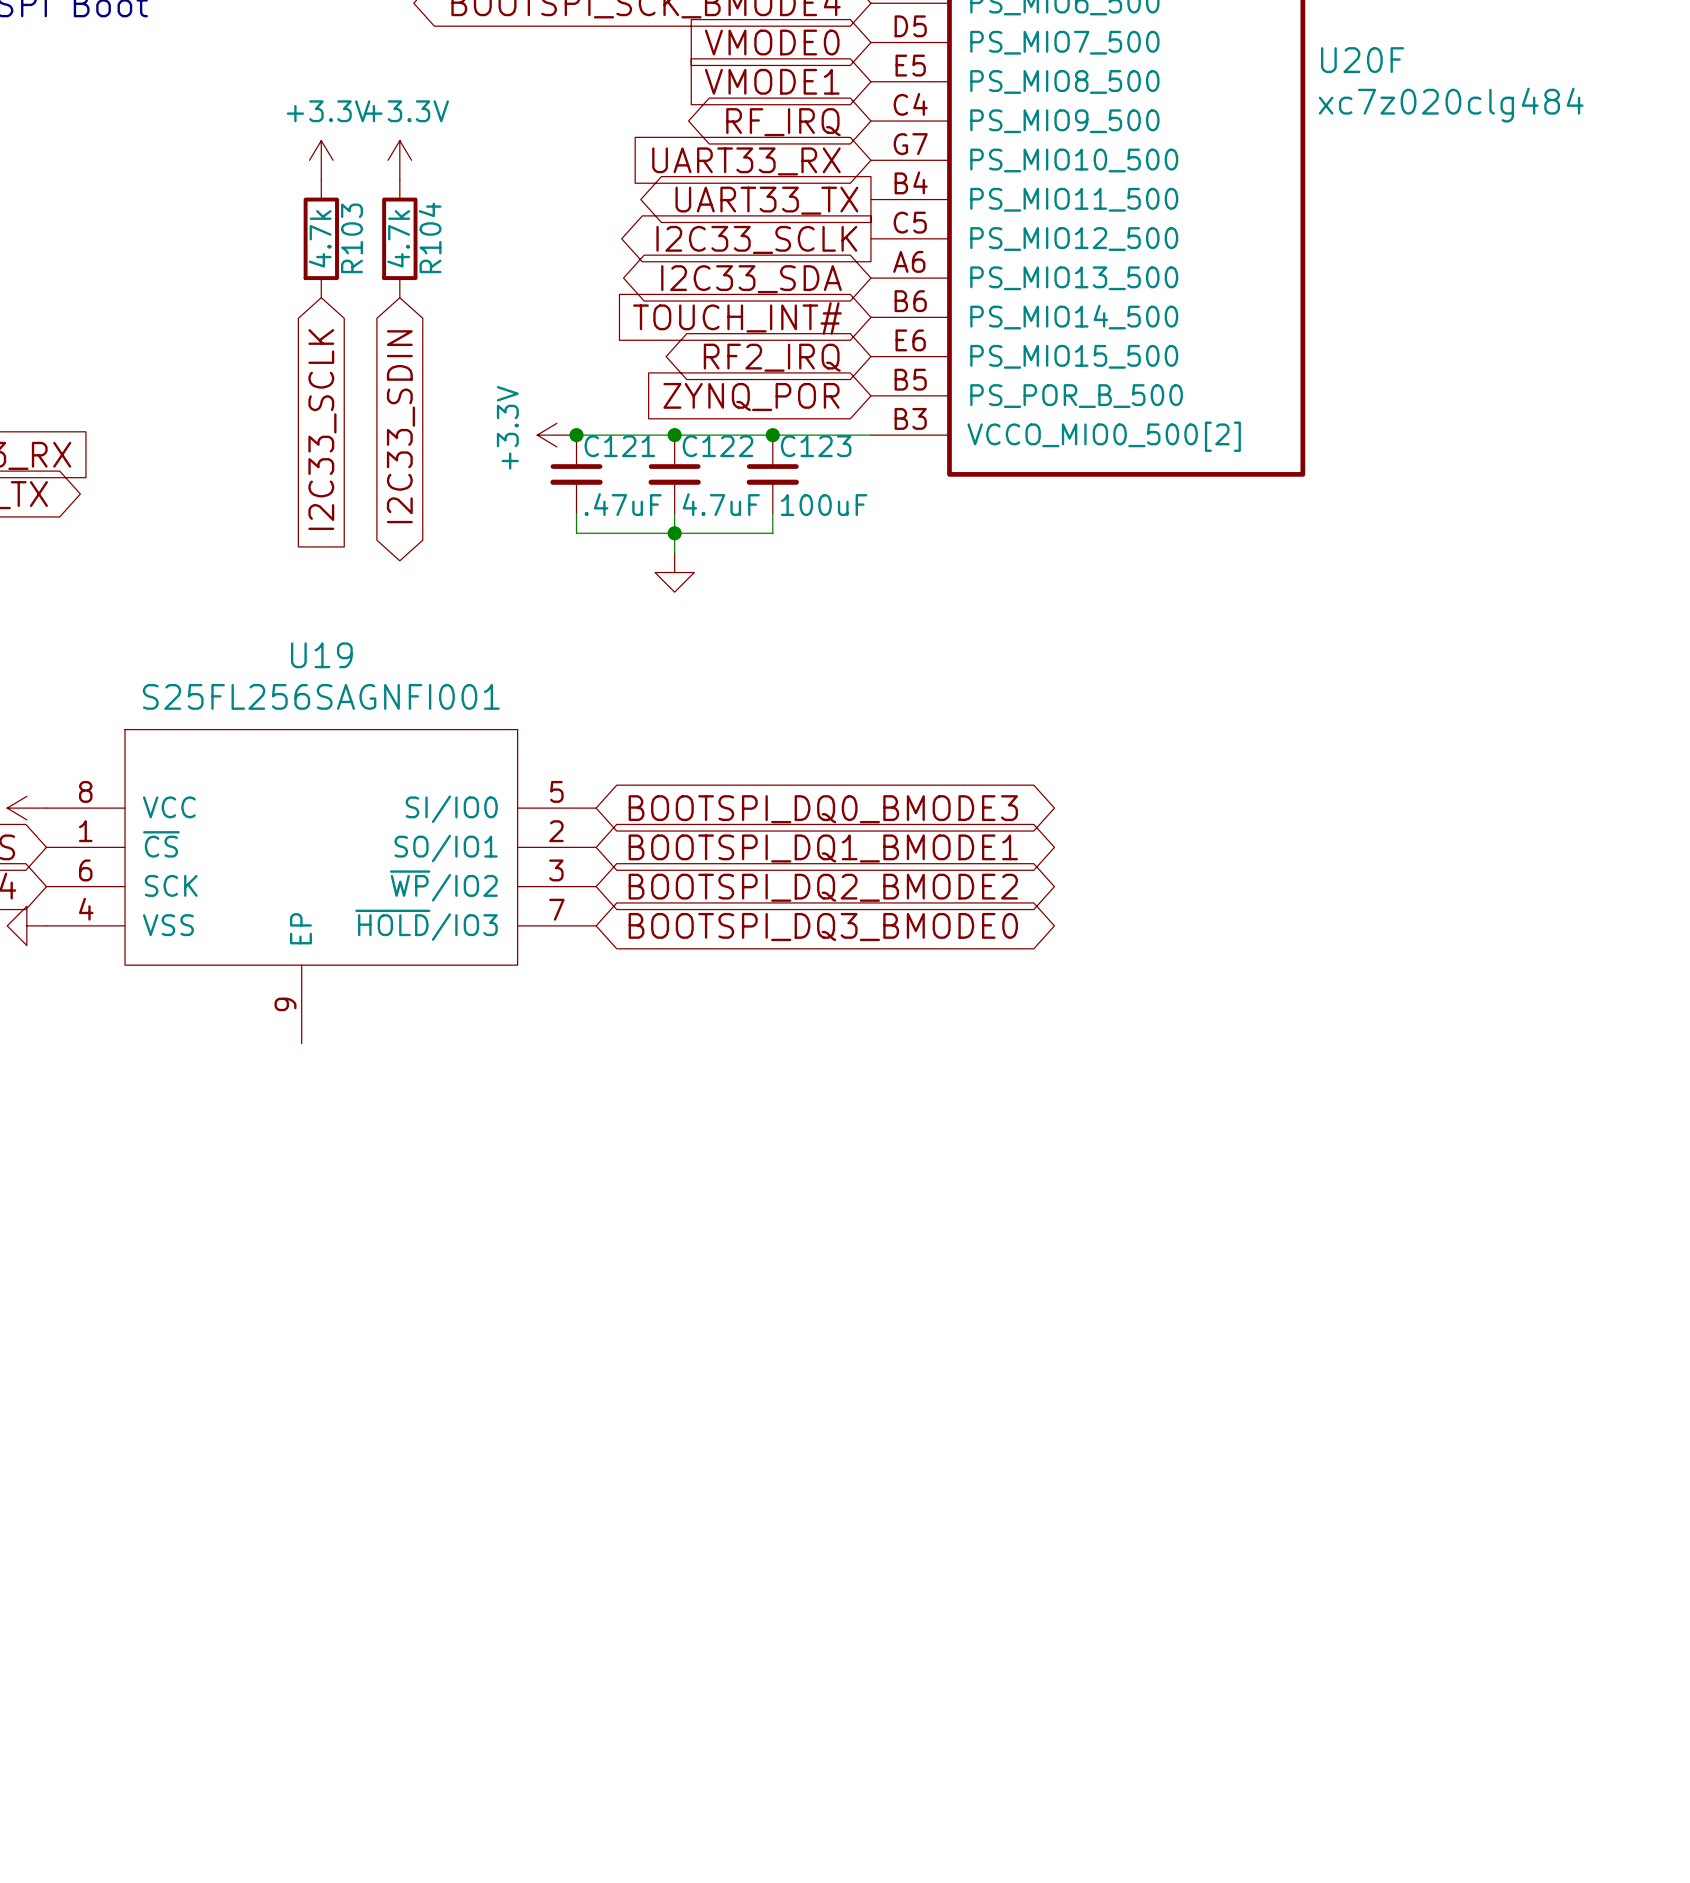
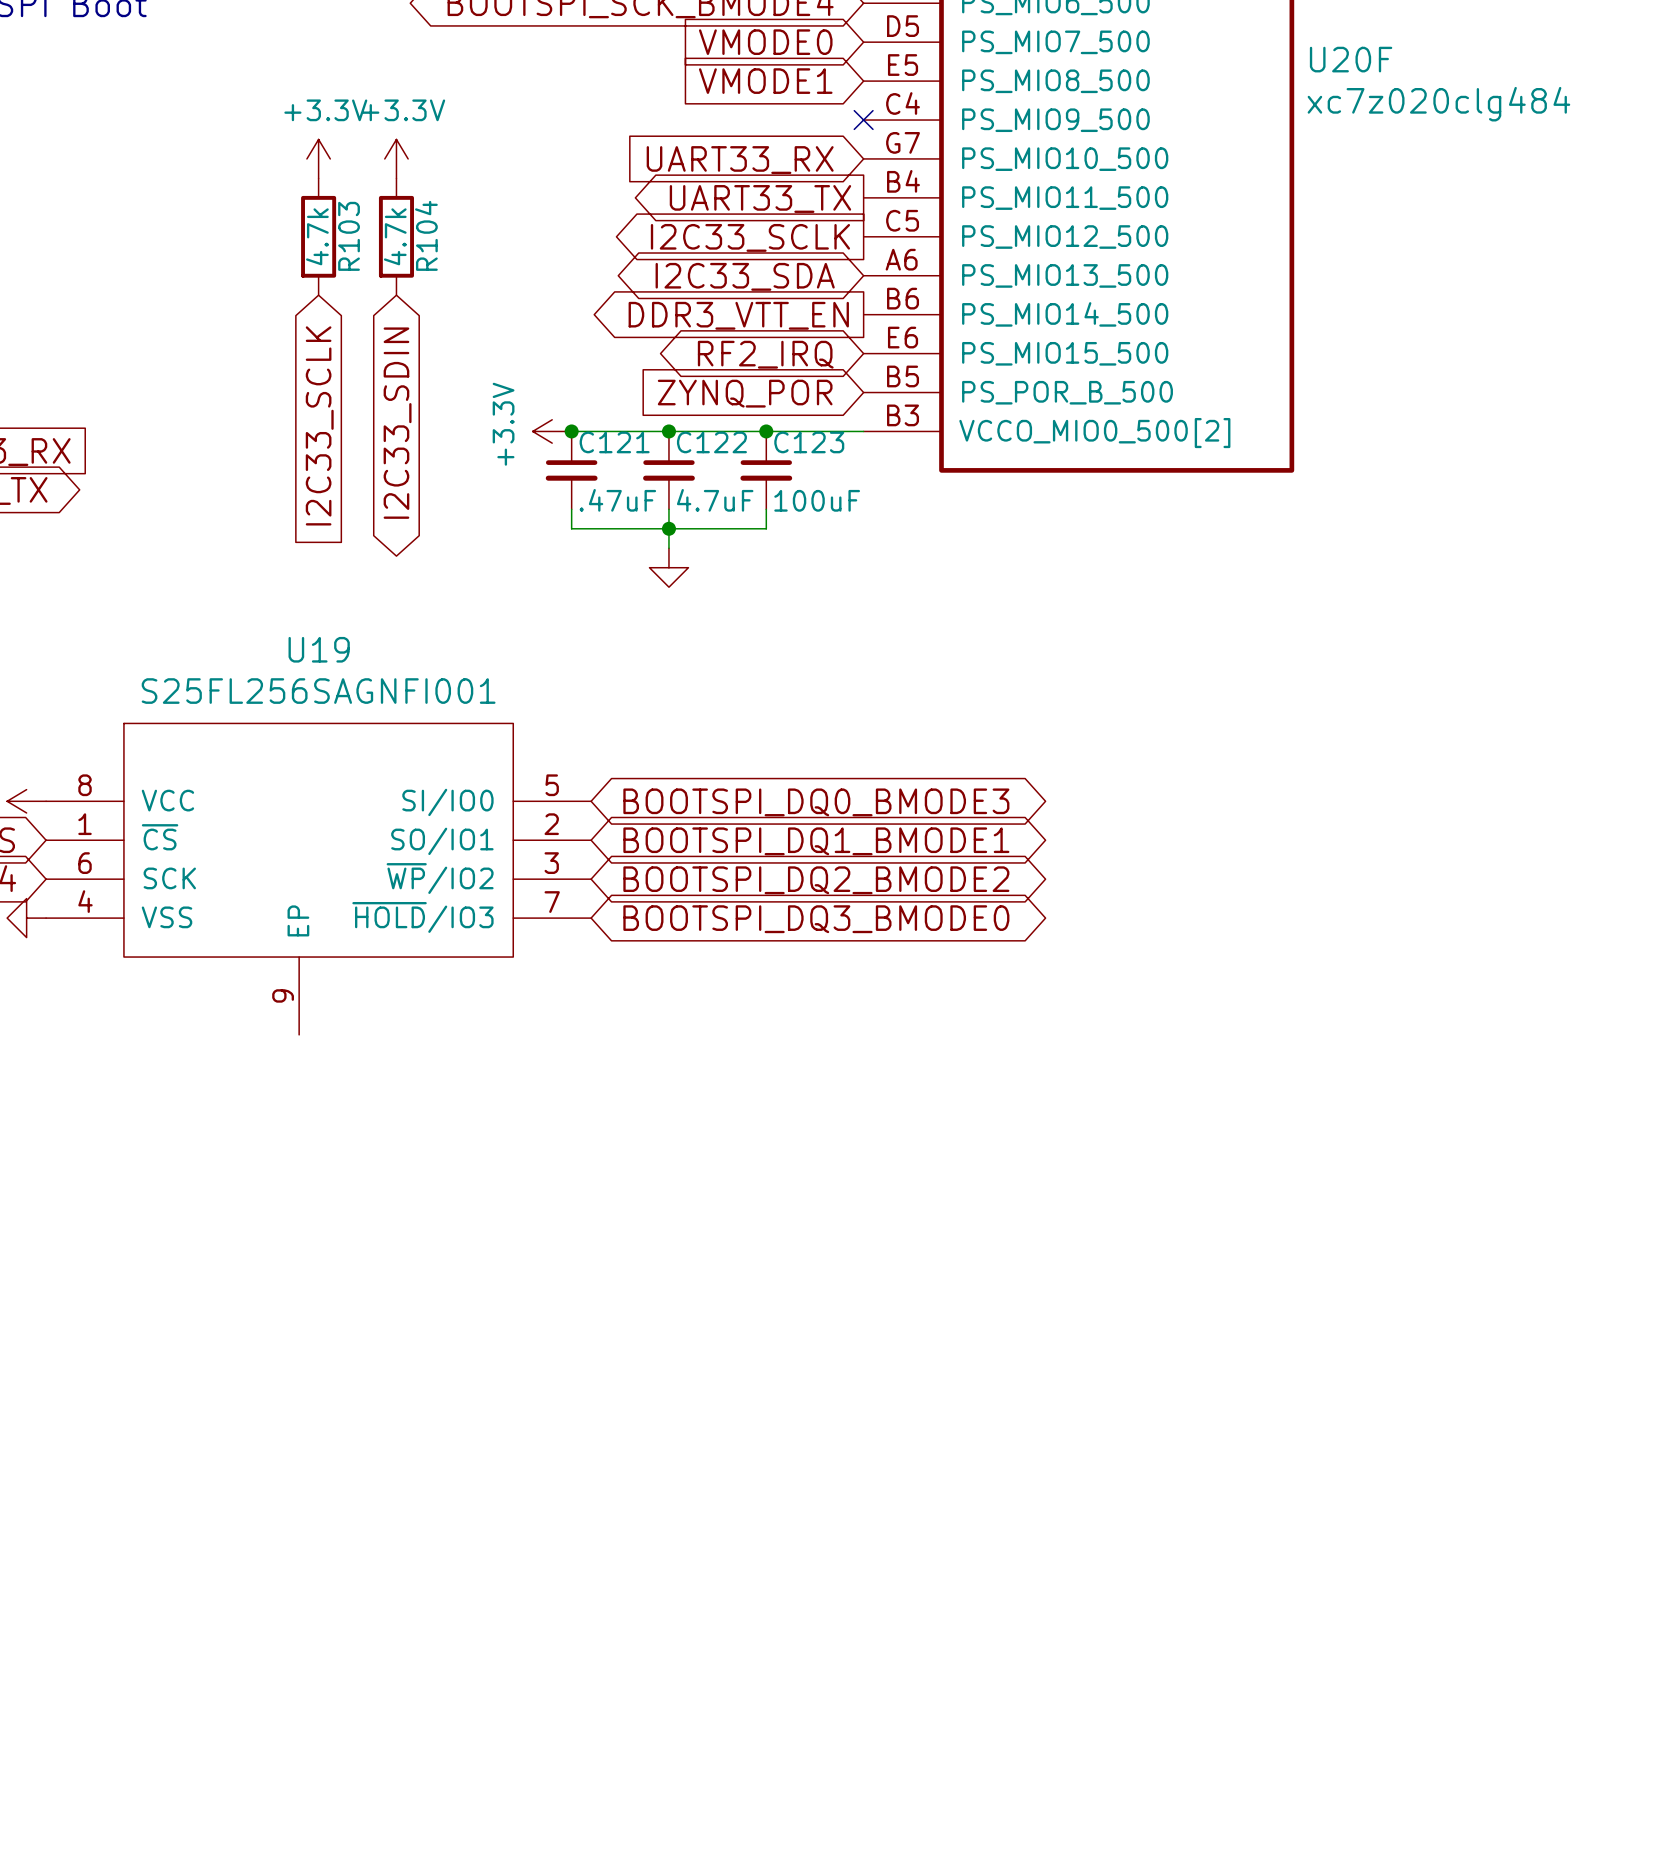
no-connect mark: none -> (863, 120)
global label: RF_IRQ (783, 122) -> none
global label shape: input (737, 318) -> output (738, 315)
global label: TOUCH_INT# (737, 318) -> DDR3_VTT_EN (738, 315)

